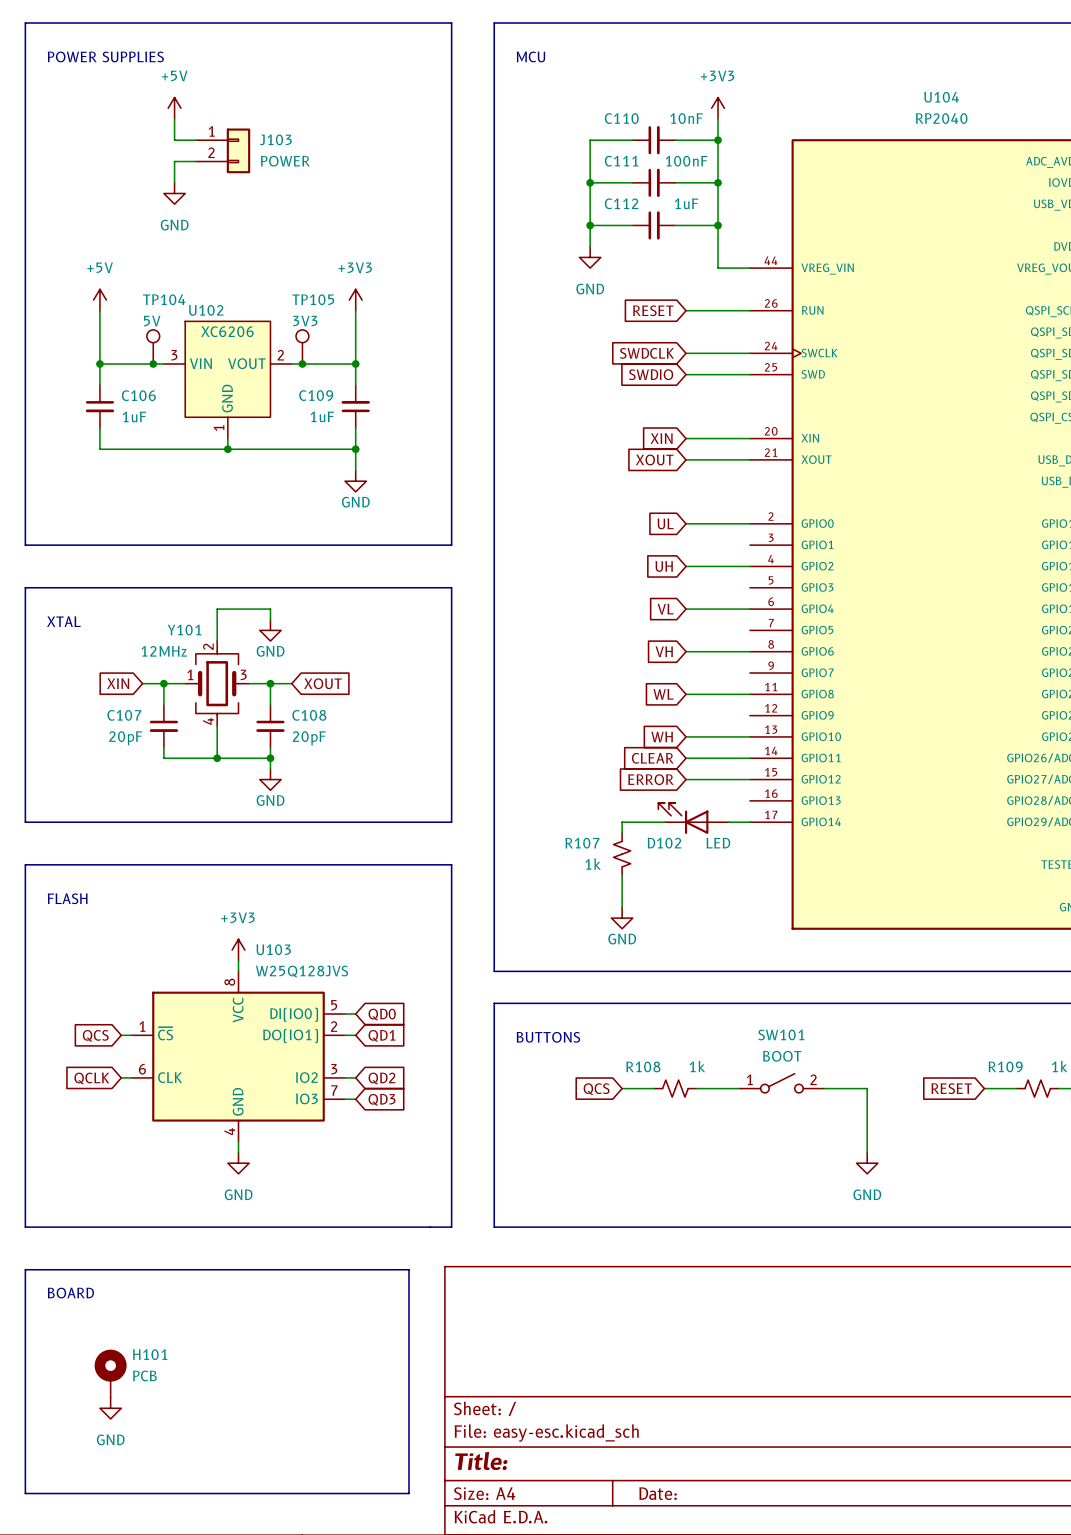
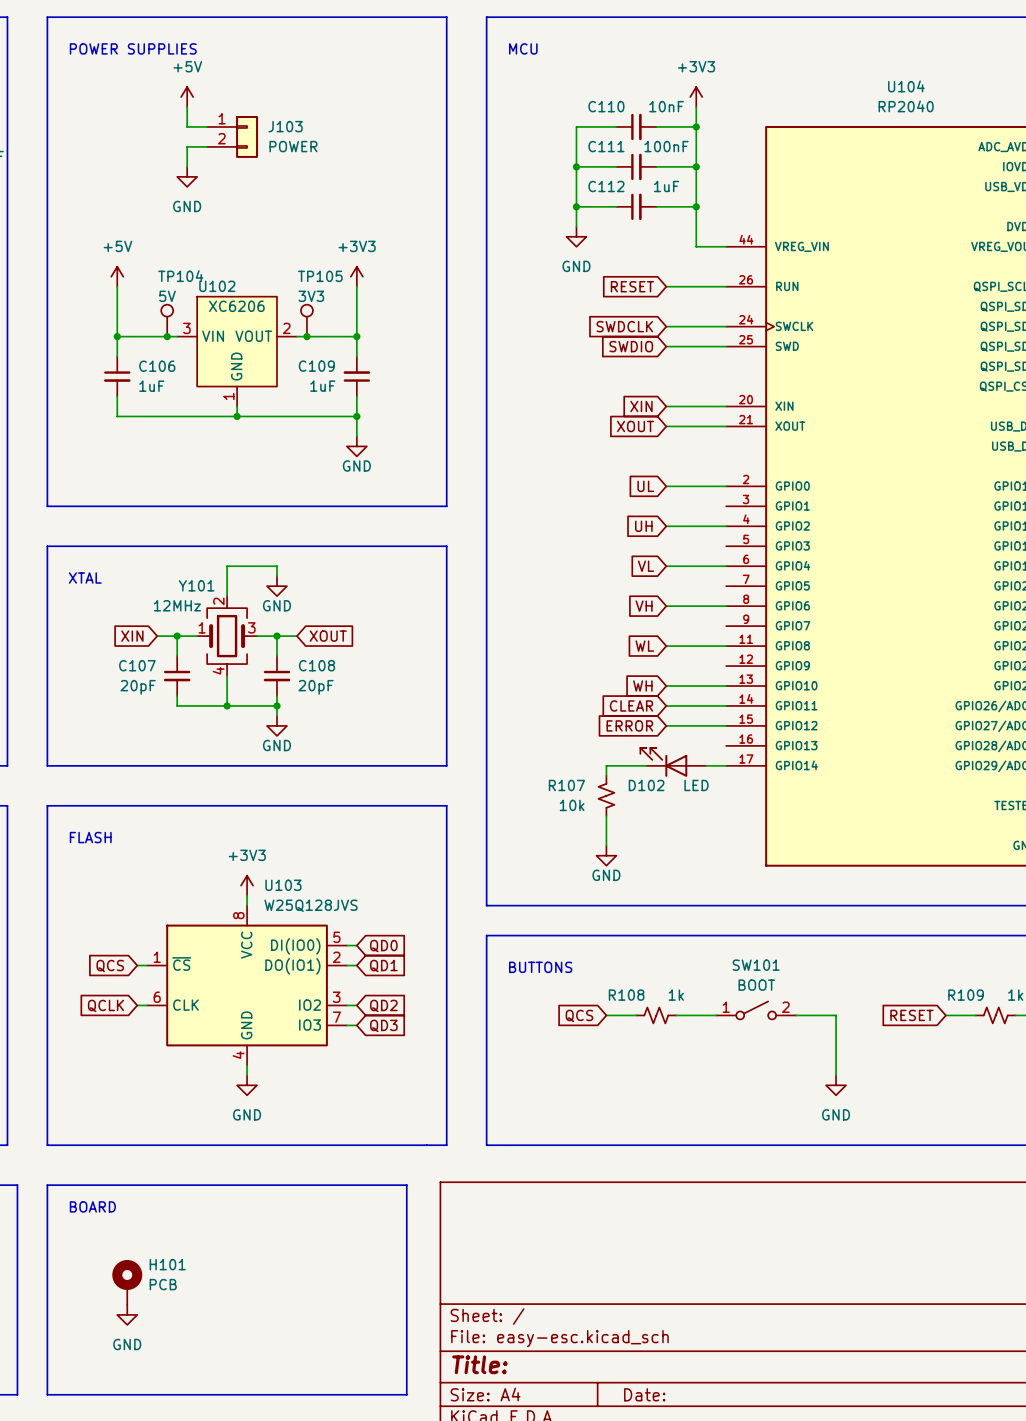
R107 value: 1k (593, 864) -> 10k (572, 805)

